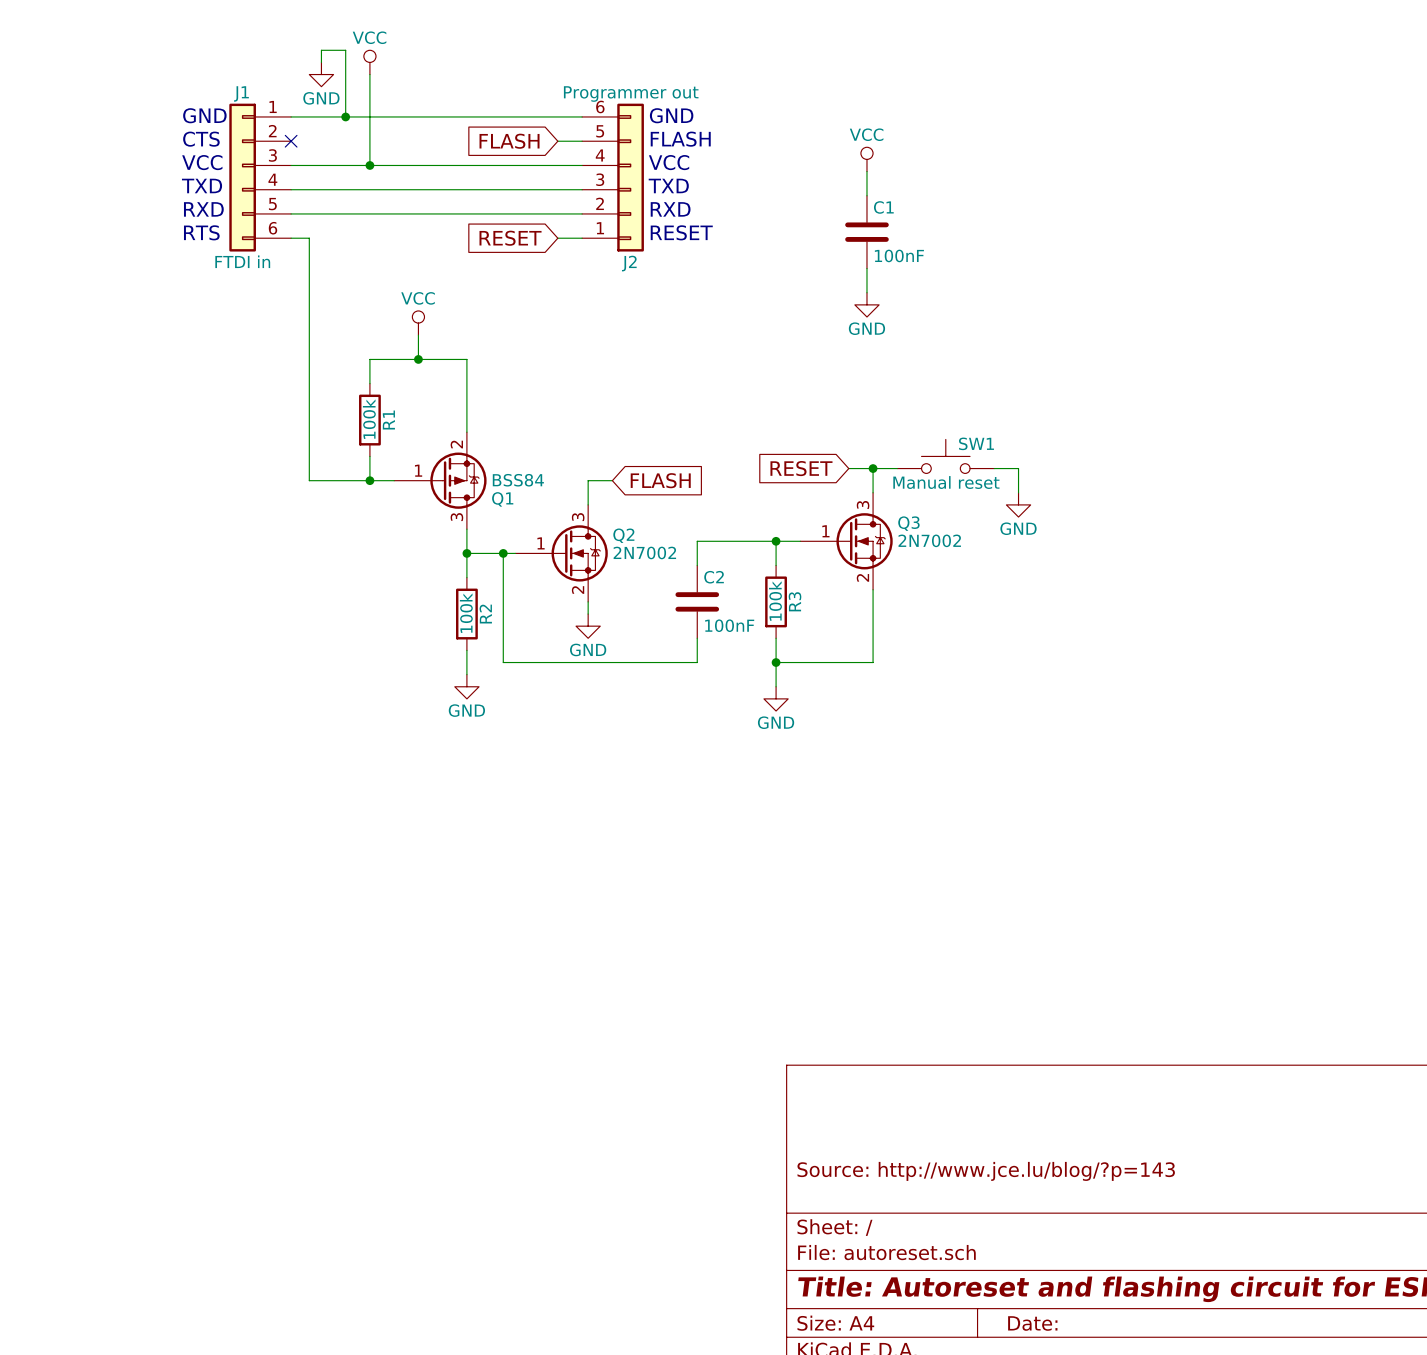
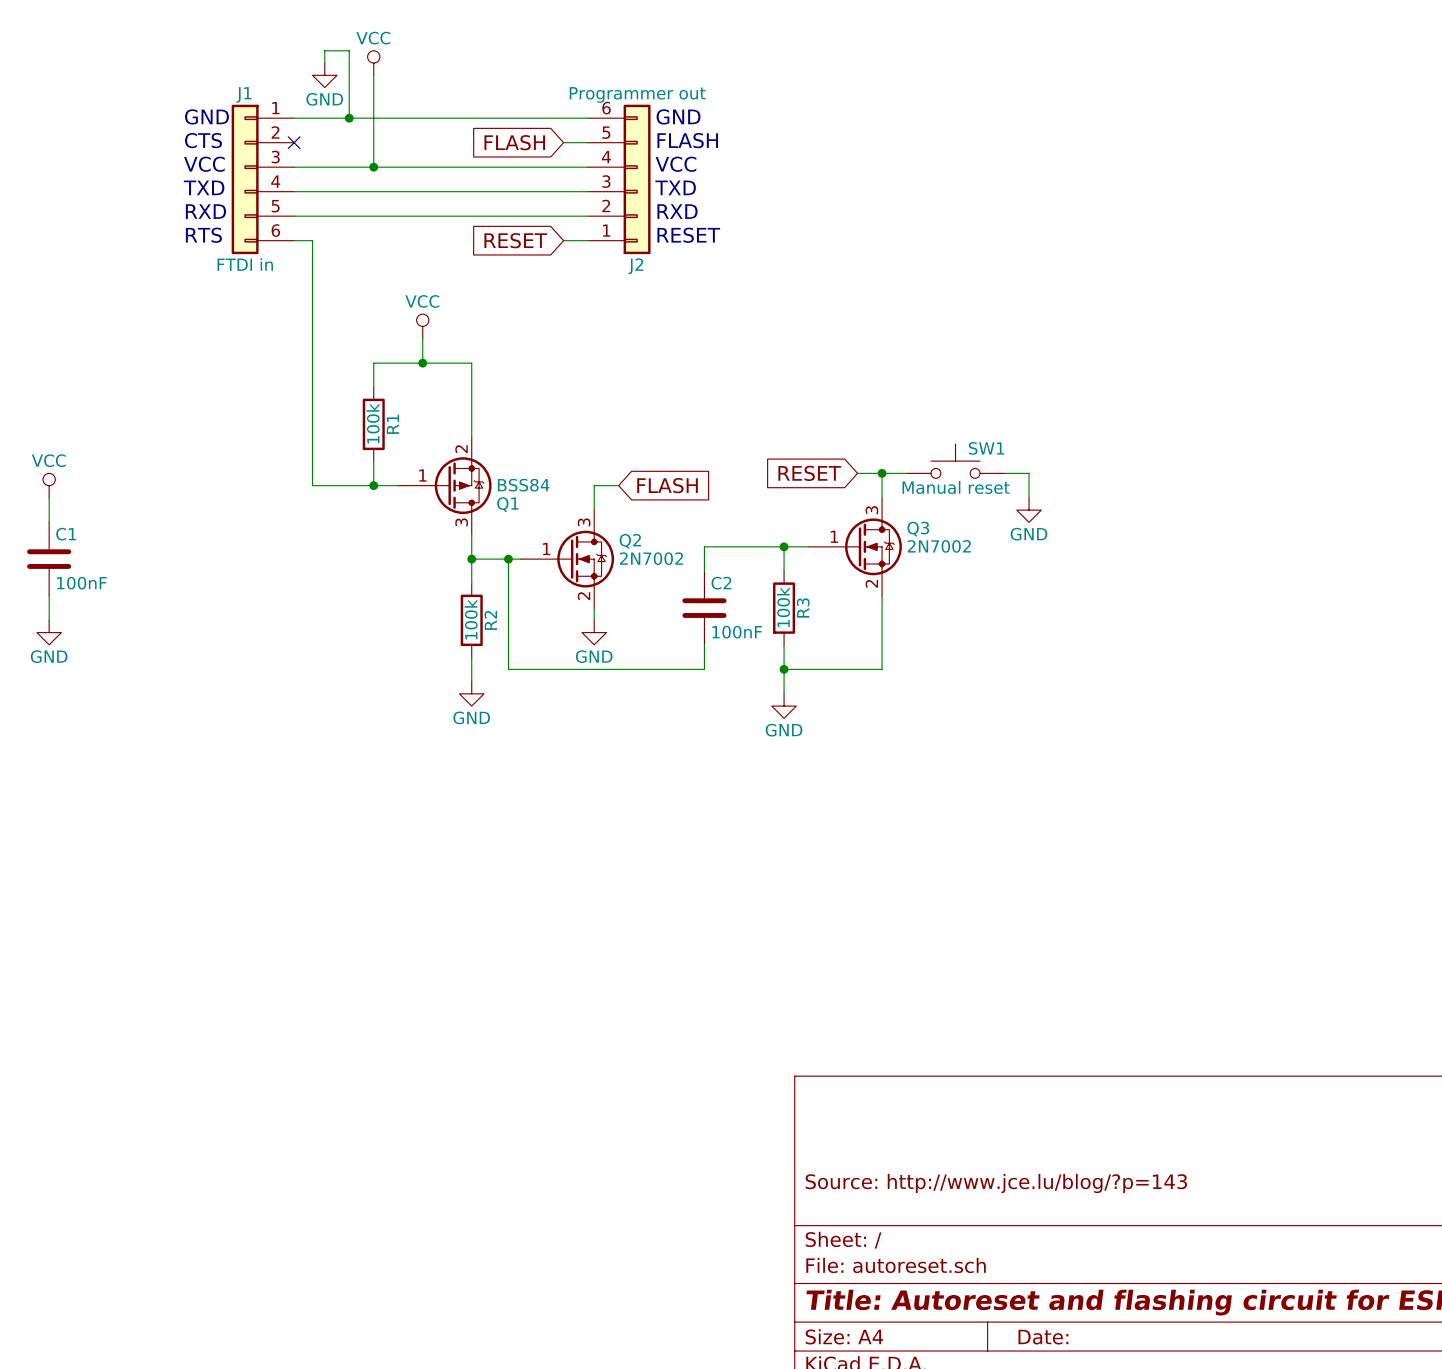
power symbol: VCC (866, 159) -> none
wire: (866, 171) (866, 195) -> none
C1 position: (866, 232) -> (49, 559)
wire: (866, 268) (866, 292) -> none
power symbol: GND (866, 304) -> none
power symbol: none -> VCC (49, 485)
wire: none -> (49, 497) (49, 522)
wire: none -> (49, 595) (49, 620)
power symbol: none -> GND (49, 632)

